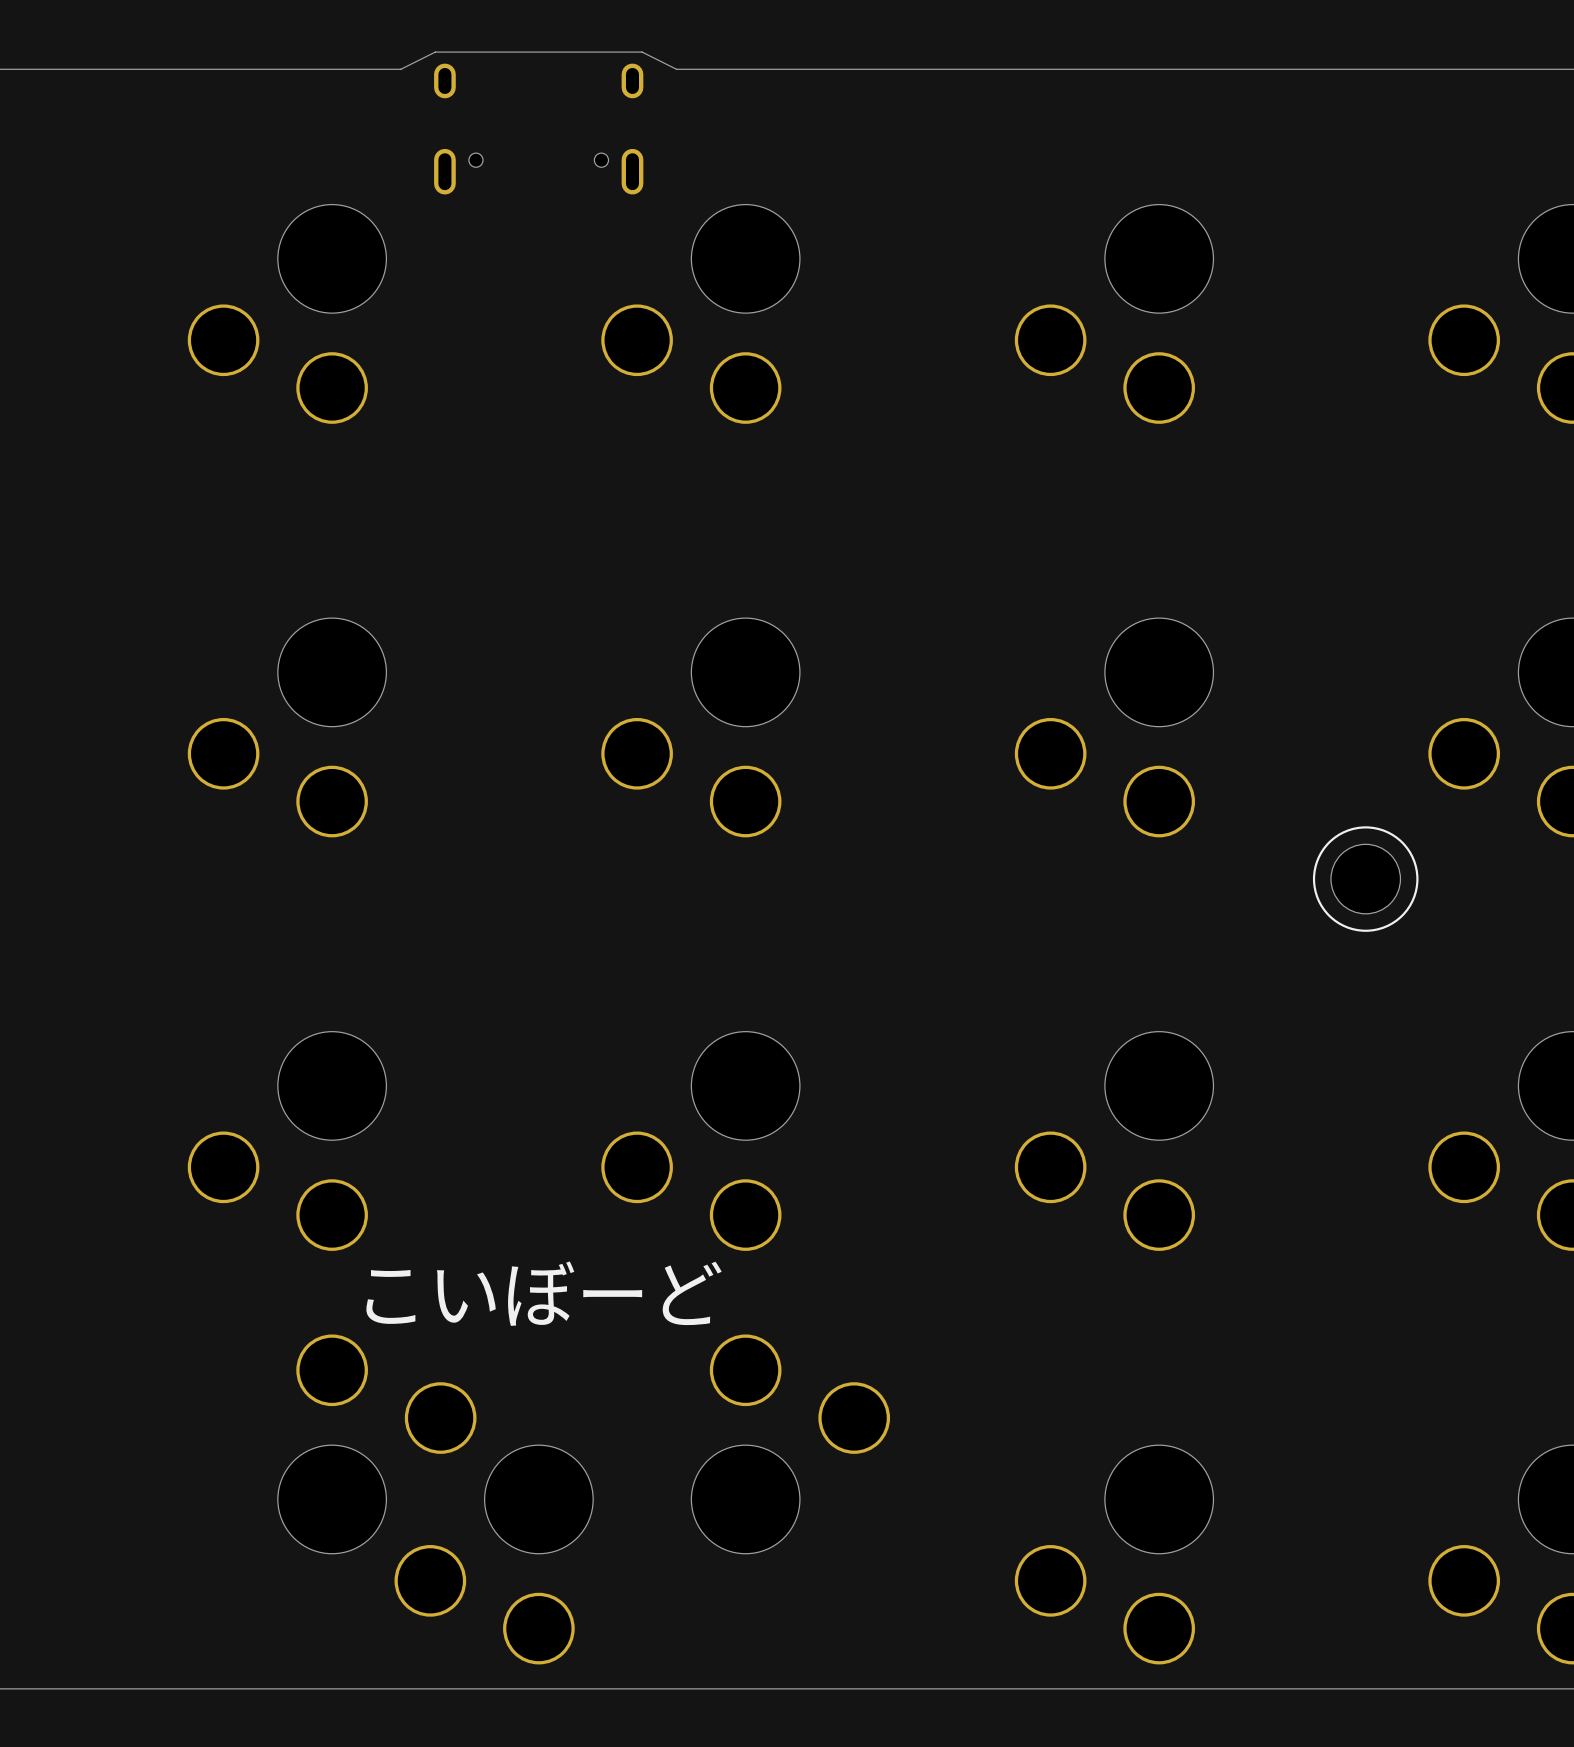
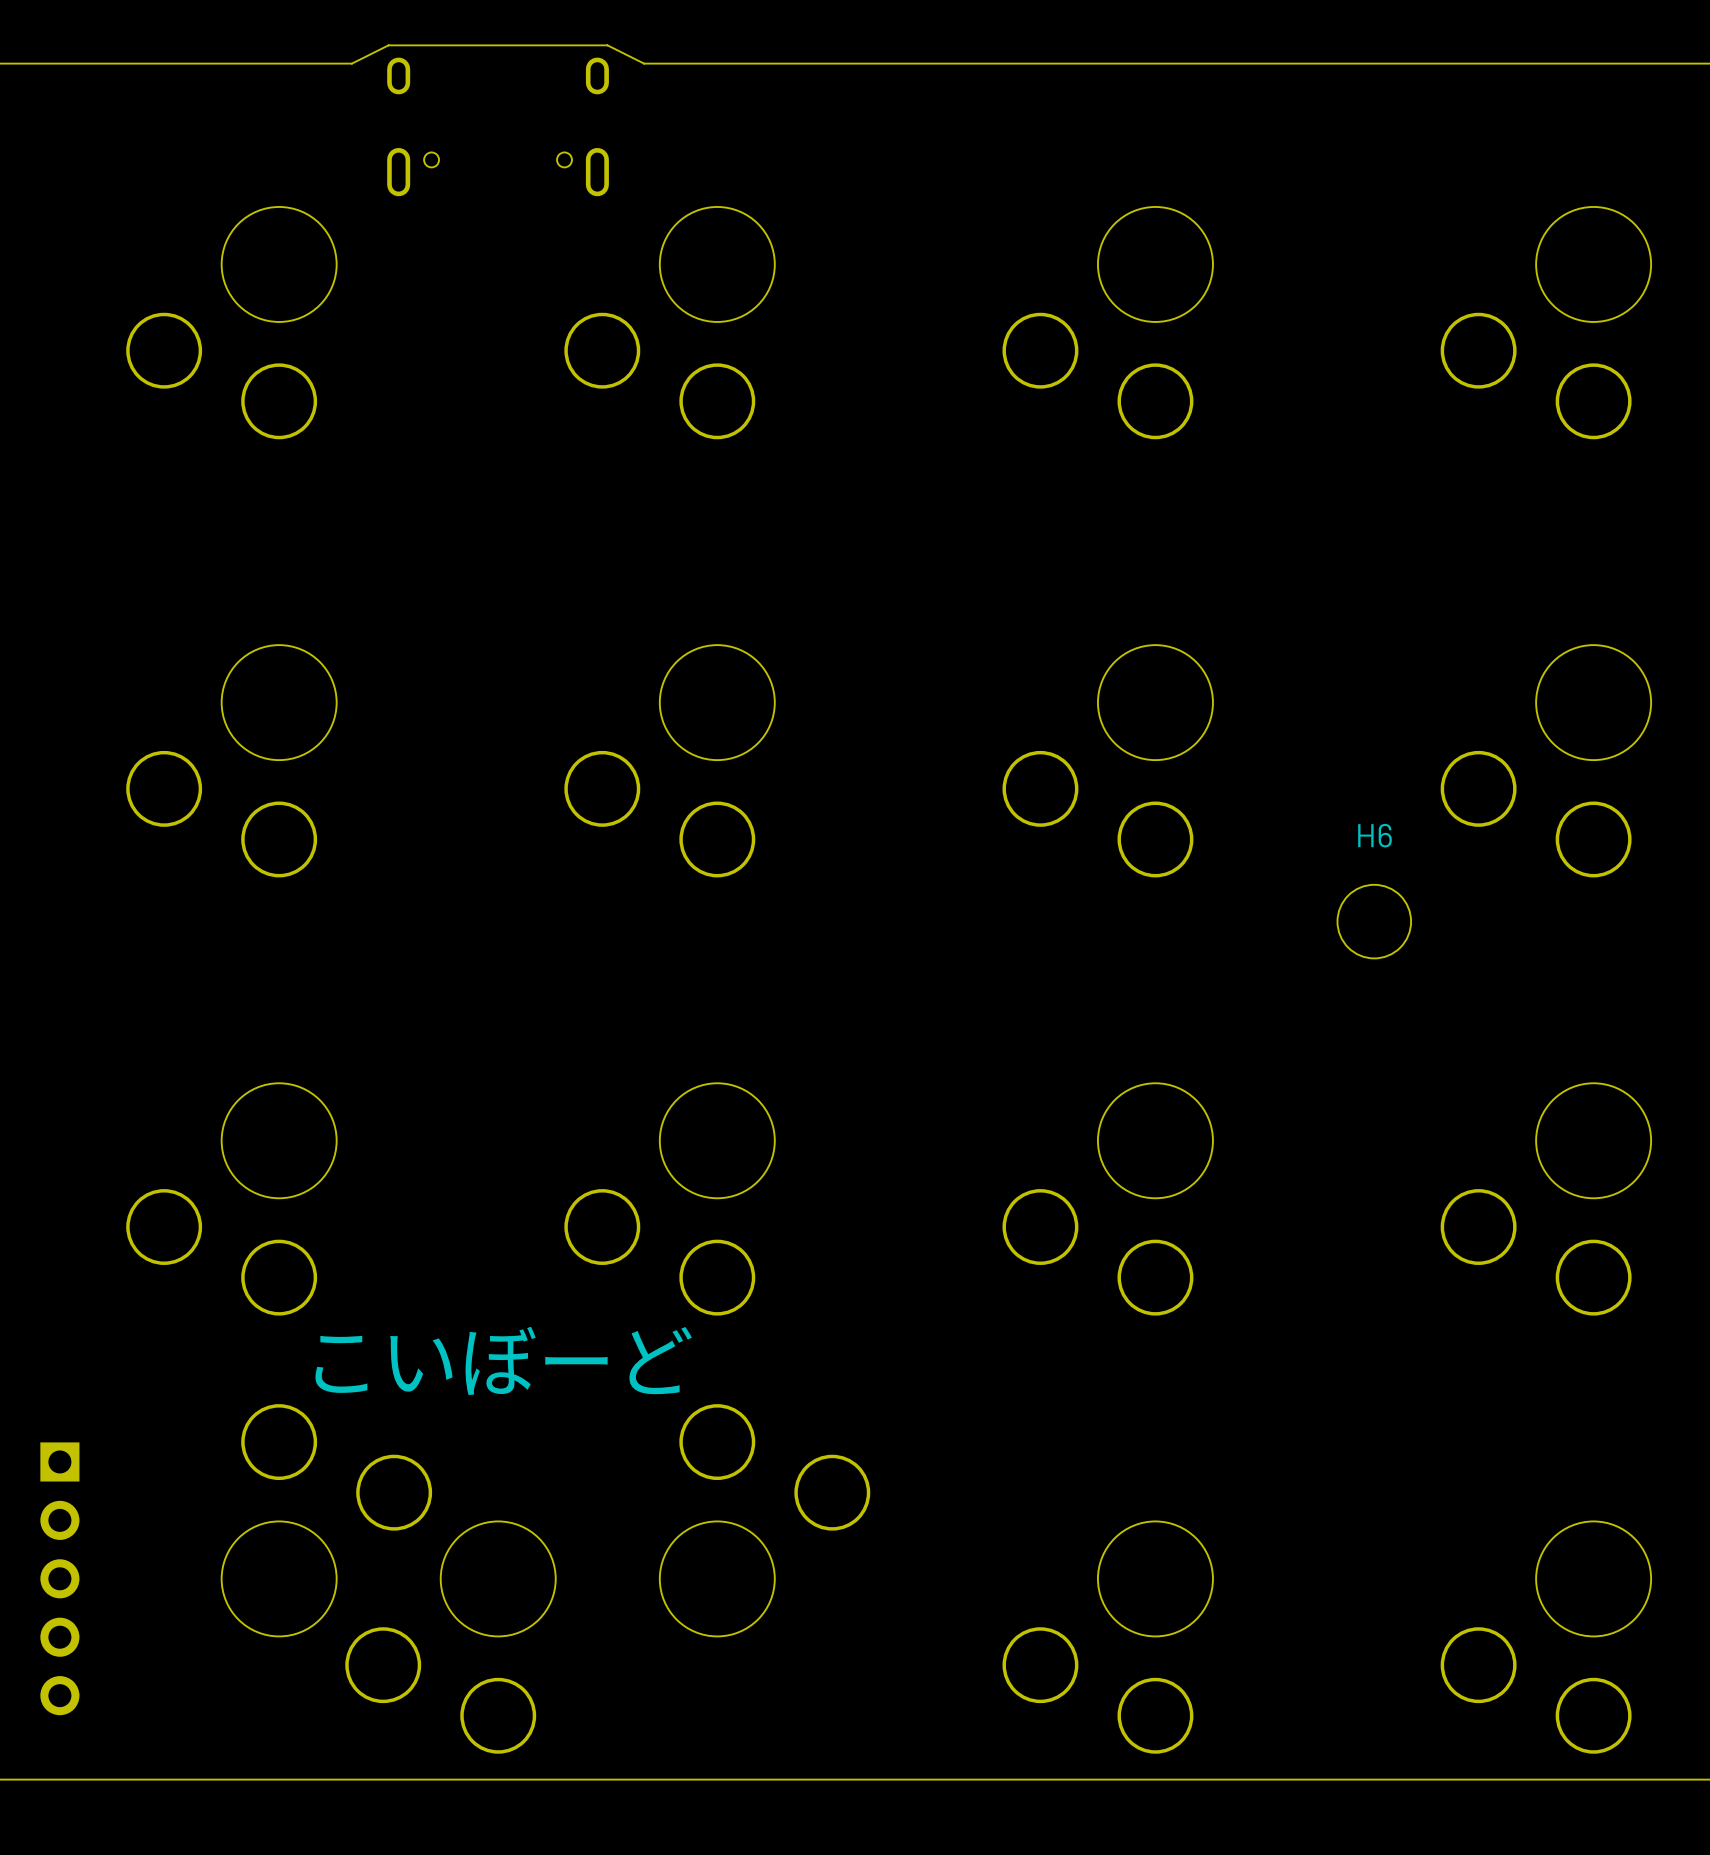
H6 name: none -> H6 (1375, 835)
drawing: [1312, 826, 1419, 932] -> none
part: none -> (59, 1578)

